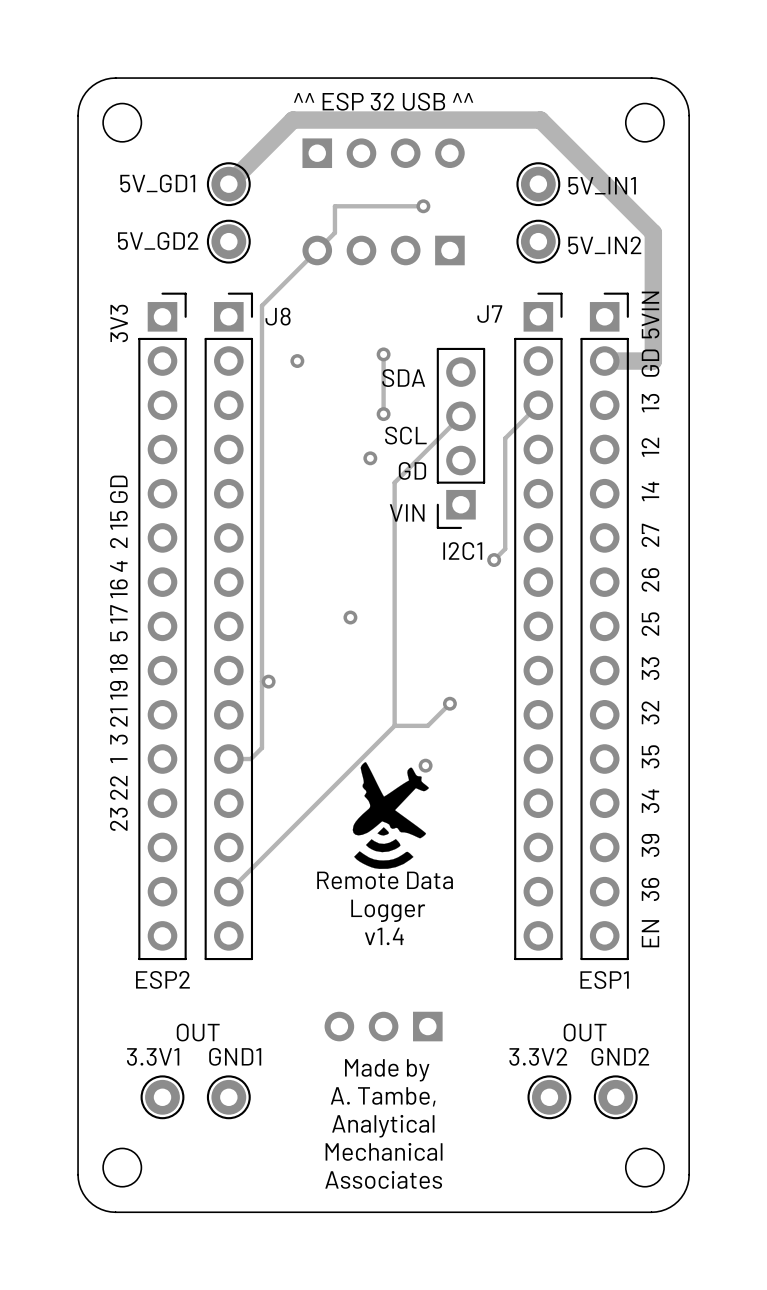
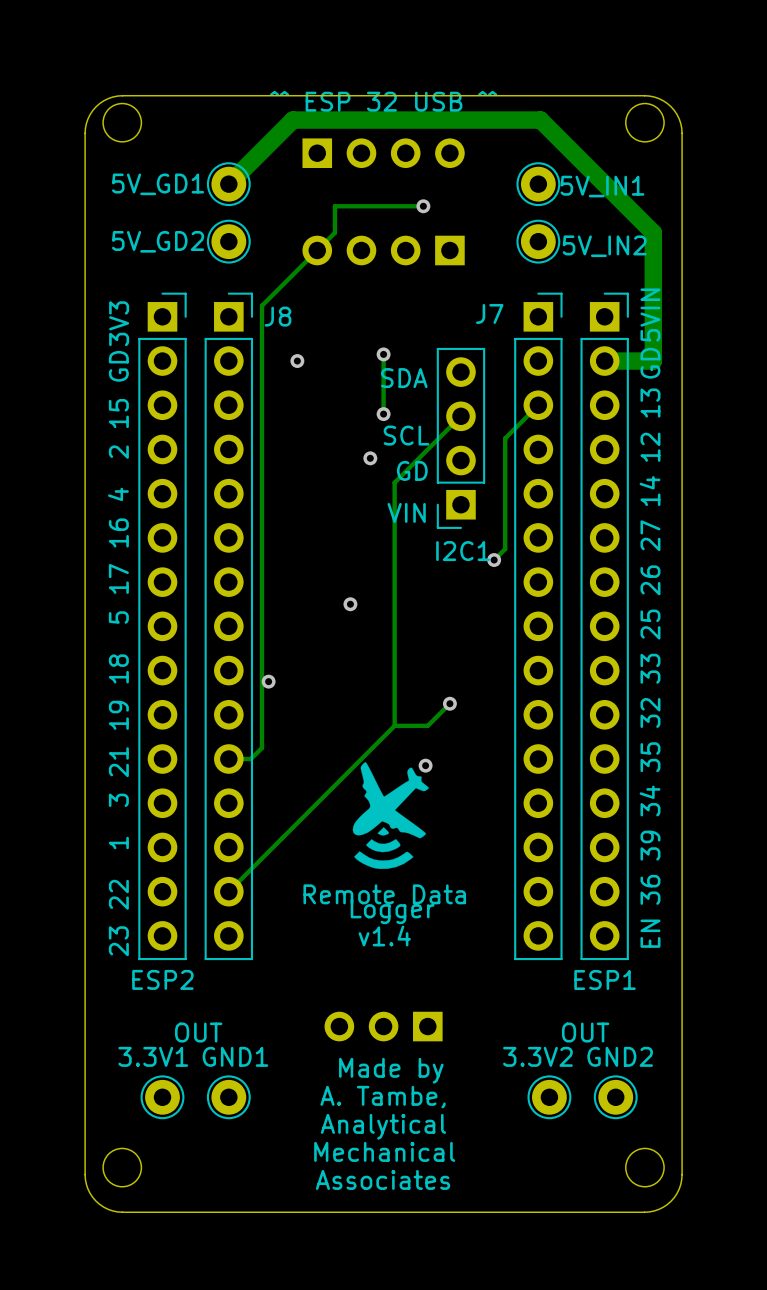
via position: (350, 617) -> (350, 604)
text position: Remote Data (385, 880) -> Remote Data (384, 894)
board edge: (644, 1212) (661, 1210) (674, 1204) (684, 1193) (689, 1174) (689, 115) (686, 101) (678, 89) (665, 80) (651, 78) (115, 78) (96, 83) (89, 89) (80, 101) (78, 115) (78, 1174) (83, 1193) (92, 1204) (105, 1210) (122, 1212) -> (644, 1212) (658, 1209) (671, 1201) (679, 1189) (682, 1174) (682, 133) (679, 118) (671, 106) (658, 98) (644, 95) (122, 95) (108, 98) (99, 103) (87, 118) (85, 133) (85, 1174) (87, 1189) (96, 1201) (108, 1209) (122, 1212)

